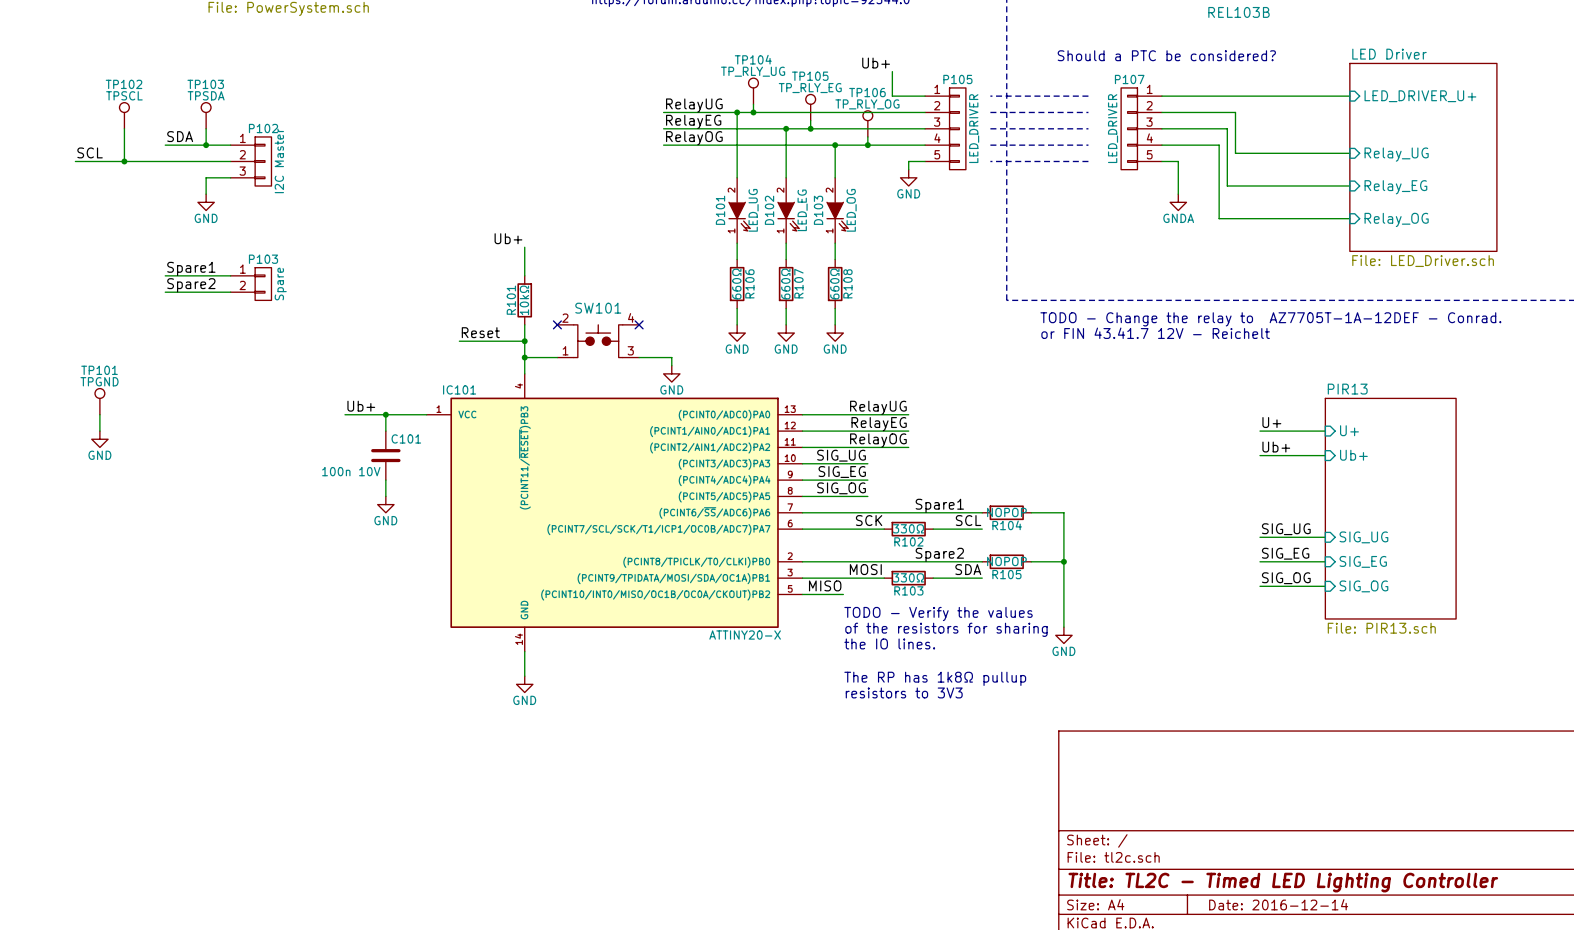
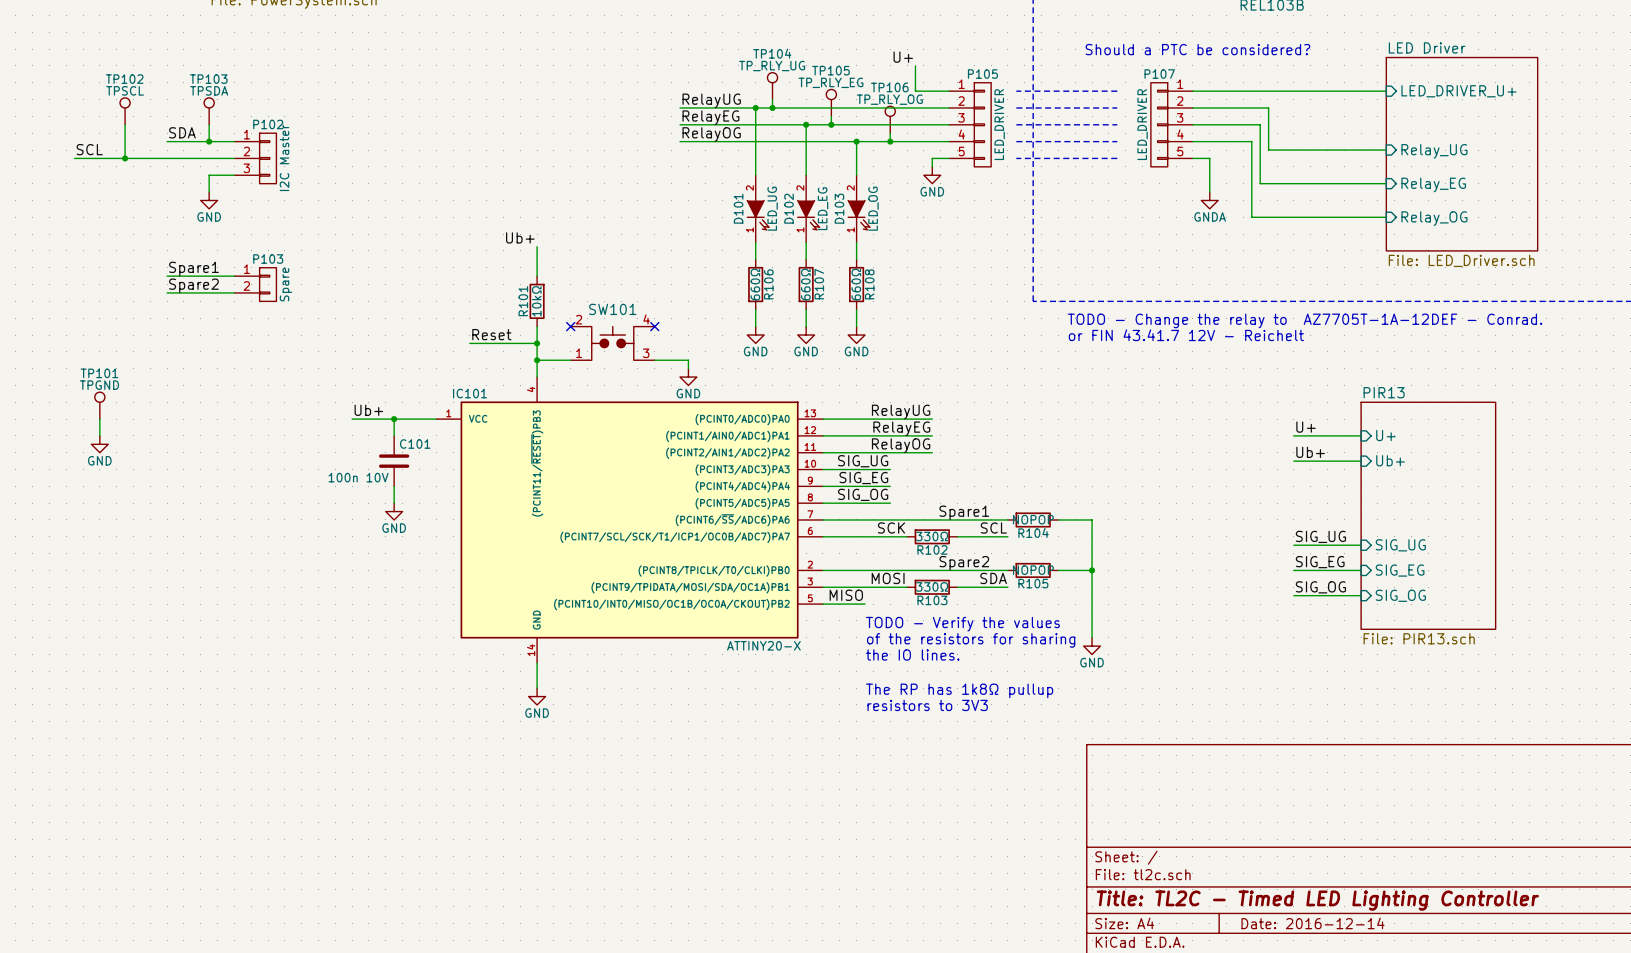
label: Ub+ (876, 63) -> U+ (903, 57)

